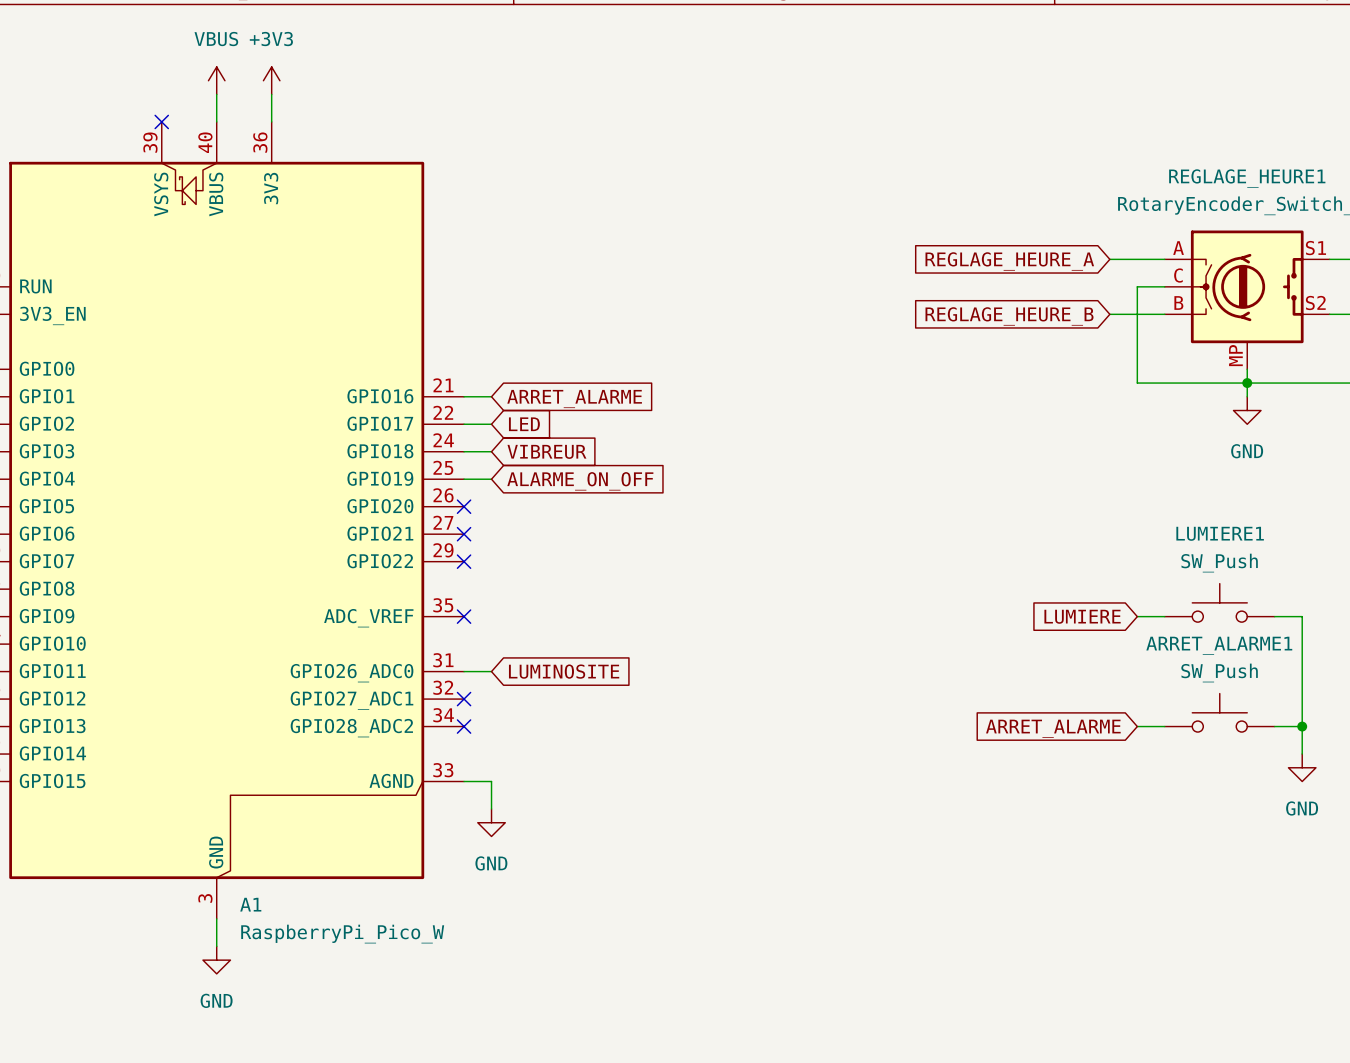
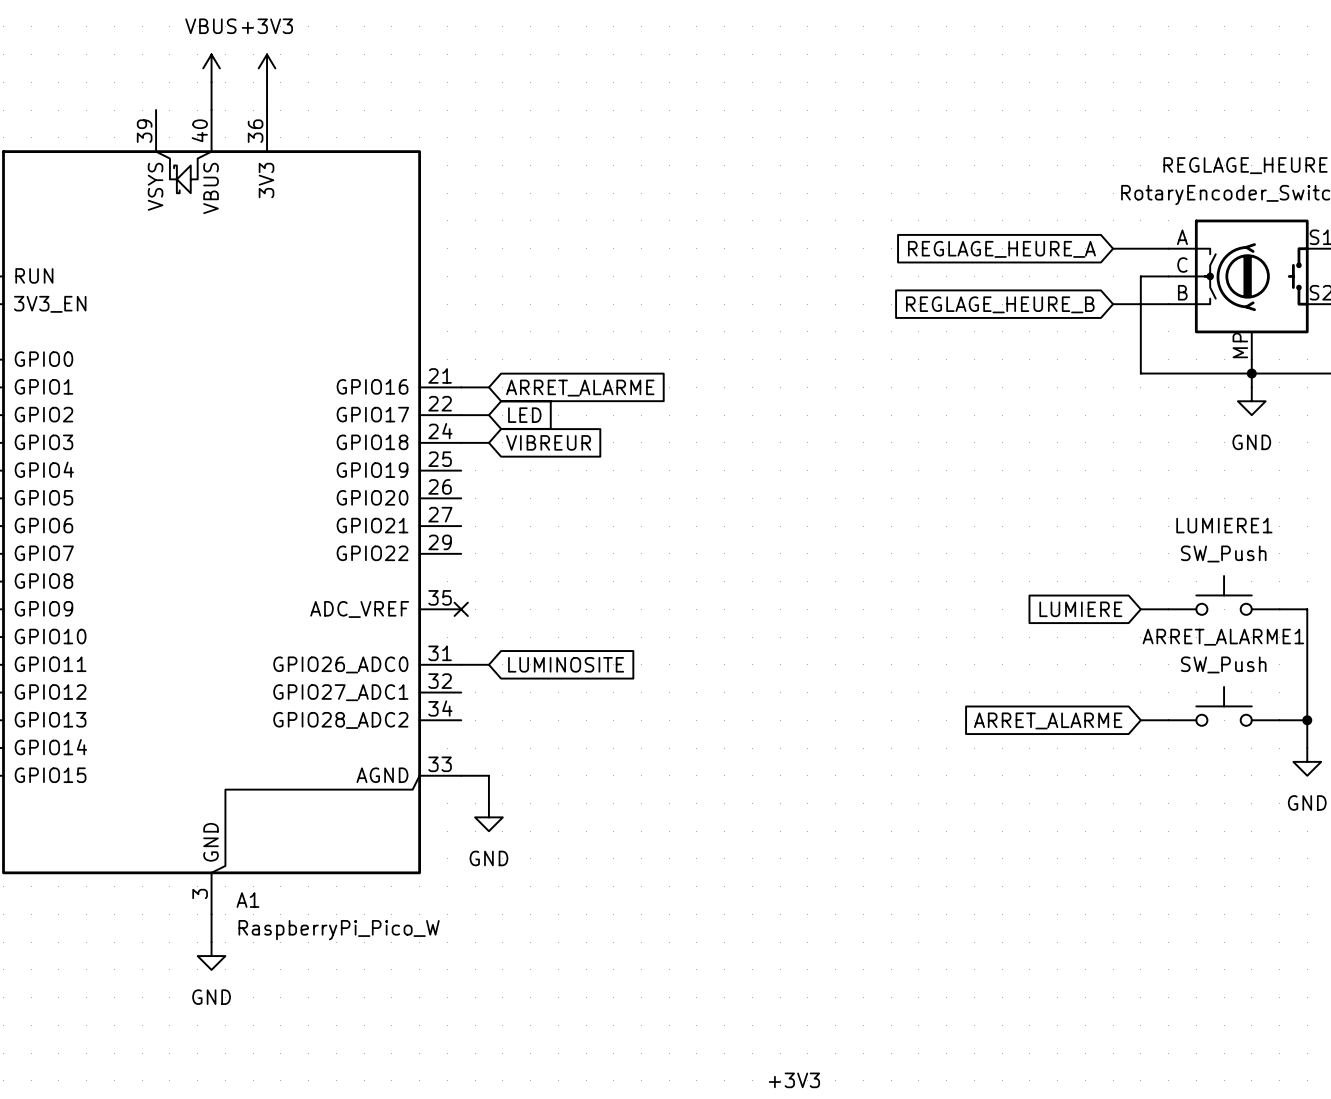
no-connect mark: (161, 121) -> none
wire: (464, 479) (491, 479) -> none
global label: ALARME_ON_OFF (580, 481) -> none
no-connect mark: (464, 506) -> none
no-connect mark: (464, 534) -> none
no-connect mark: (464, 561) -> none
no-connect mark: (464, 699) -> none
no-connect mark: (464, 726) -> none

